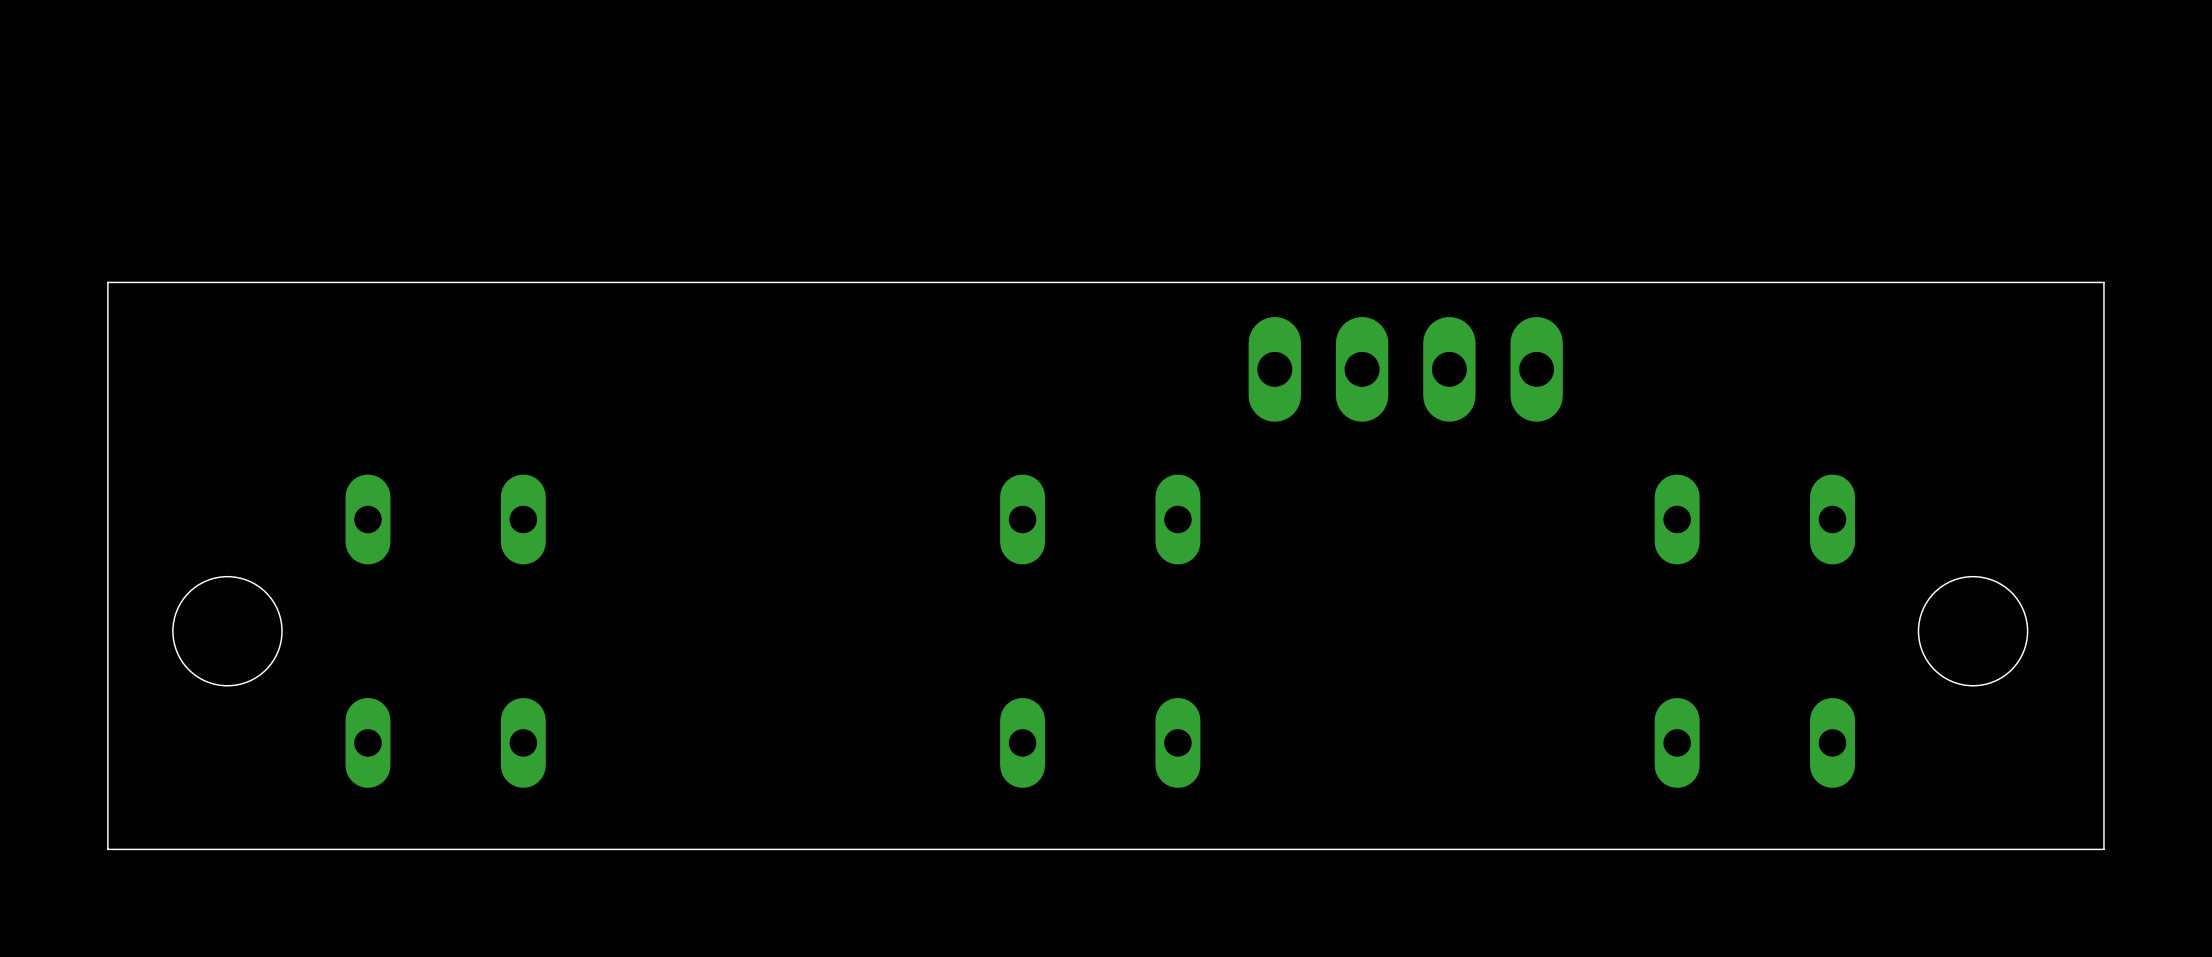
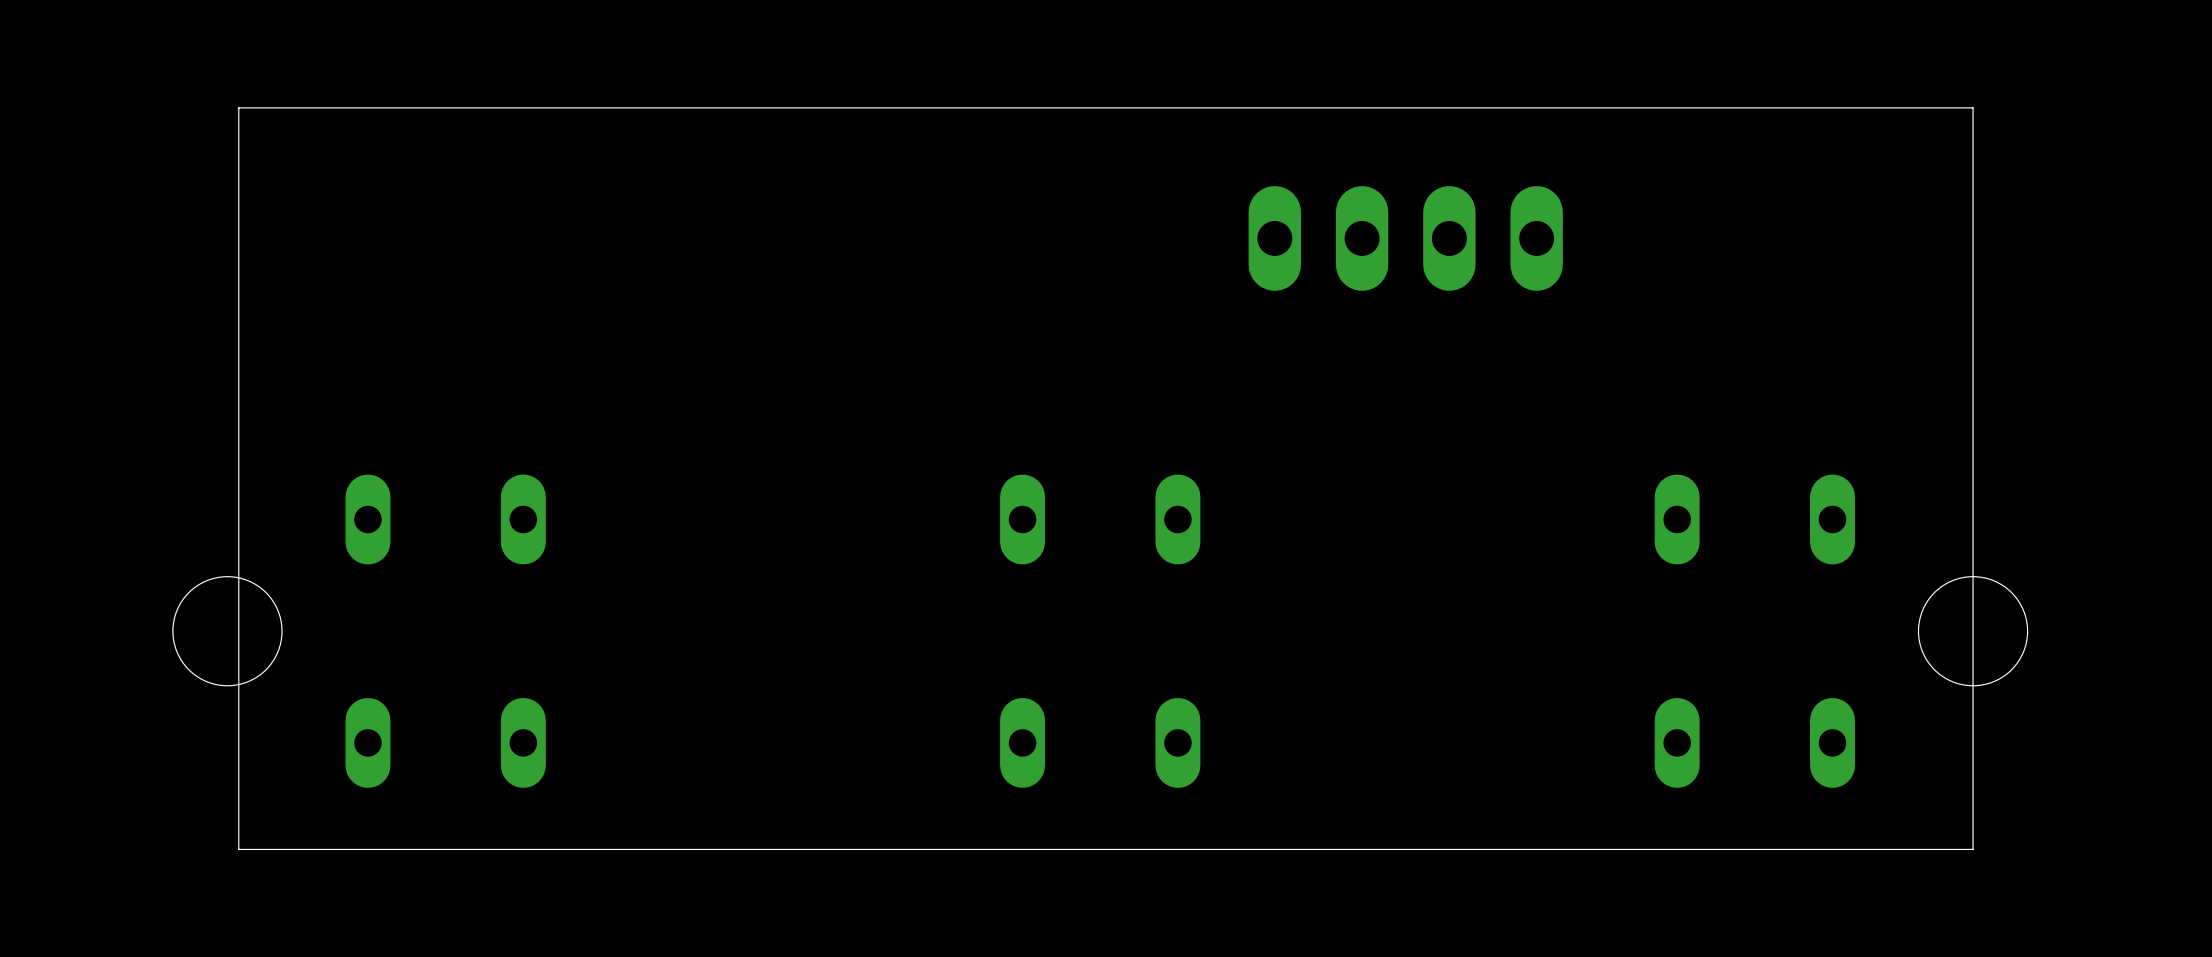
part position: (1405, 369) -> (1405, 238)
board edge: (1973, 849) (2103, 849) (2103, 282) (107, 282) (107, 849) (238, 849) -> (1973, 849) (1973, 107) (238, 107) (238, 849)

